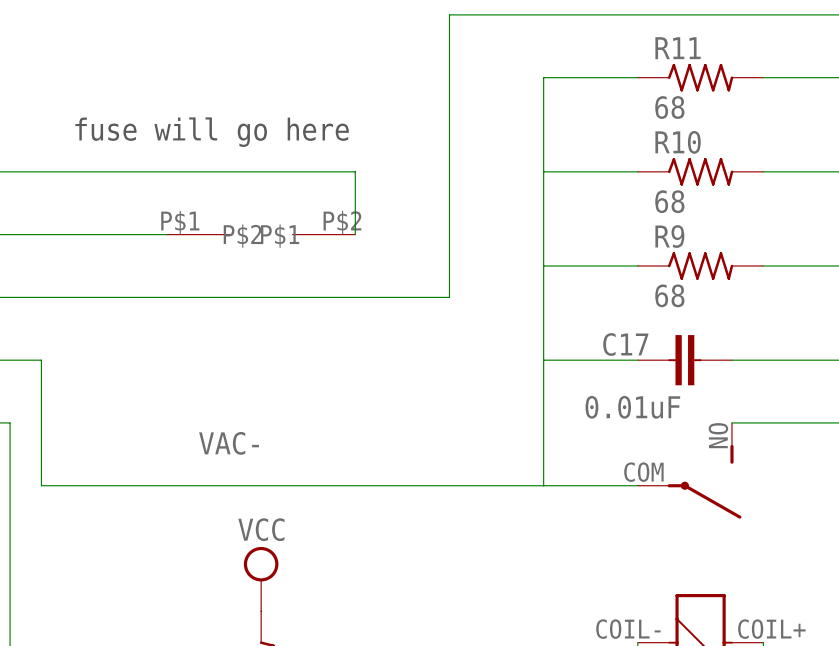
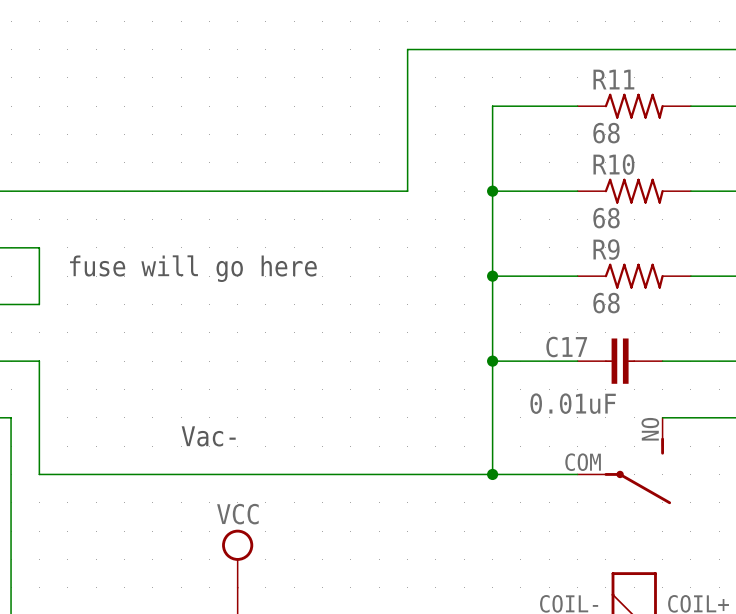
text position: fuse will go here (212, 132) -> fuse will go here (193, 268)
wire: (355, 171) (355, 234) -> (322, 191) (407, 191)
wire: (449, 171) (449, 297) (41, 297) -> none
junction: none -> (492, 191)
wire: (41, 234) (166, 234) -> (39, 247) (39, 304)
part: (261, 234) -> none
junction: none -> (492, 276)
junction: none -> (492, 361)
text: none -> Vac- (208, 436)
label: VAC- (229, 443) -> none
junction: none -> (492, 474)

